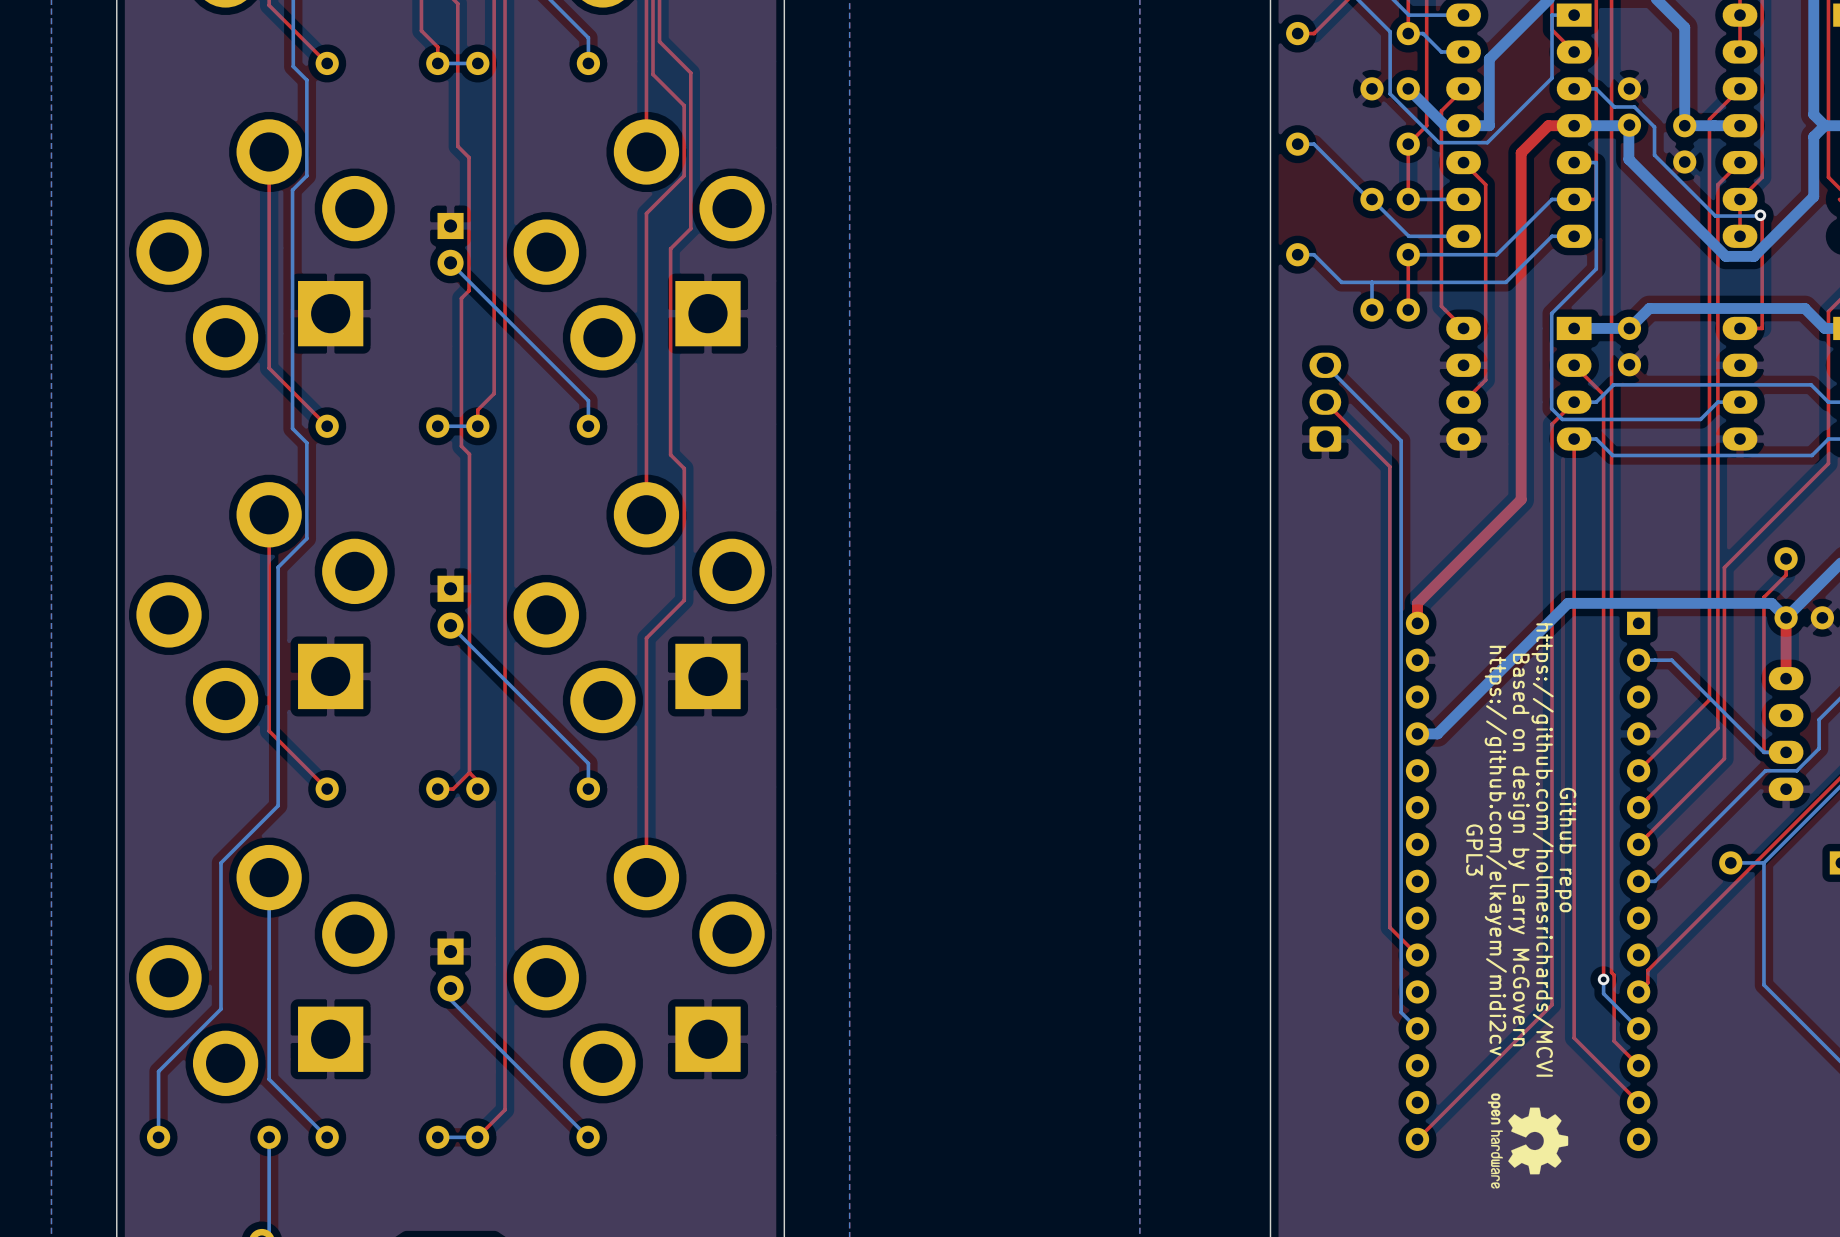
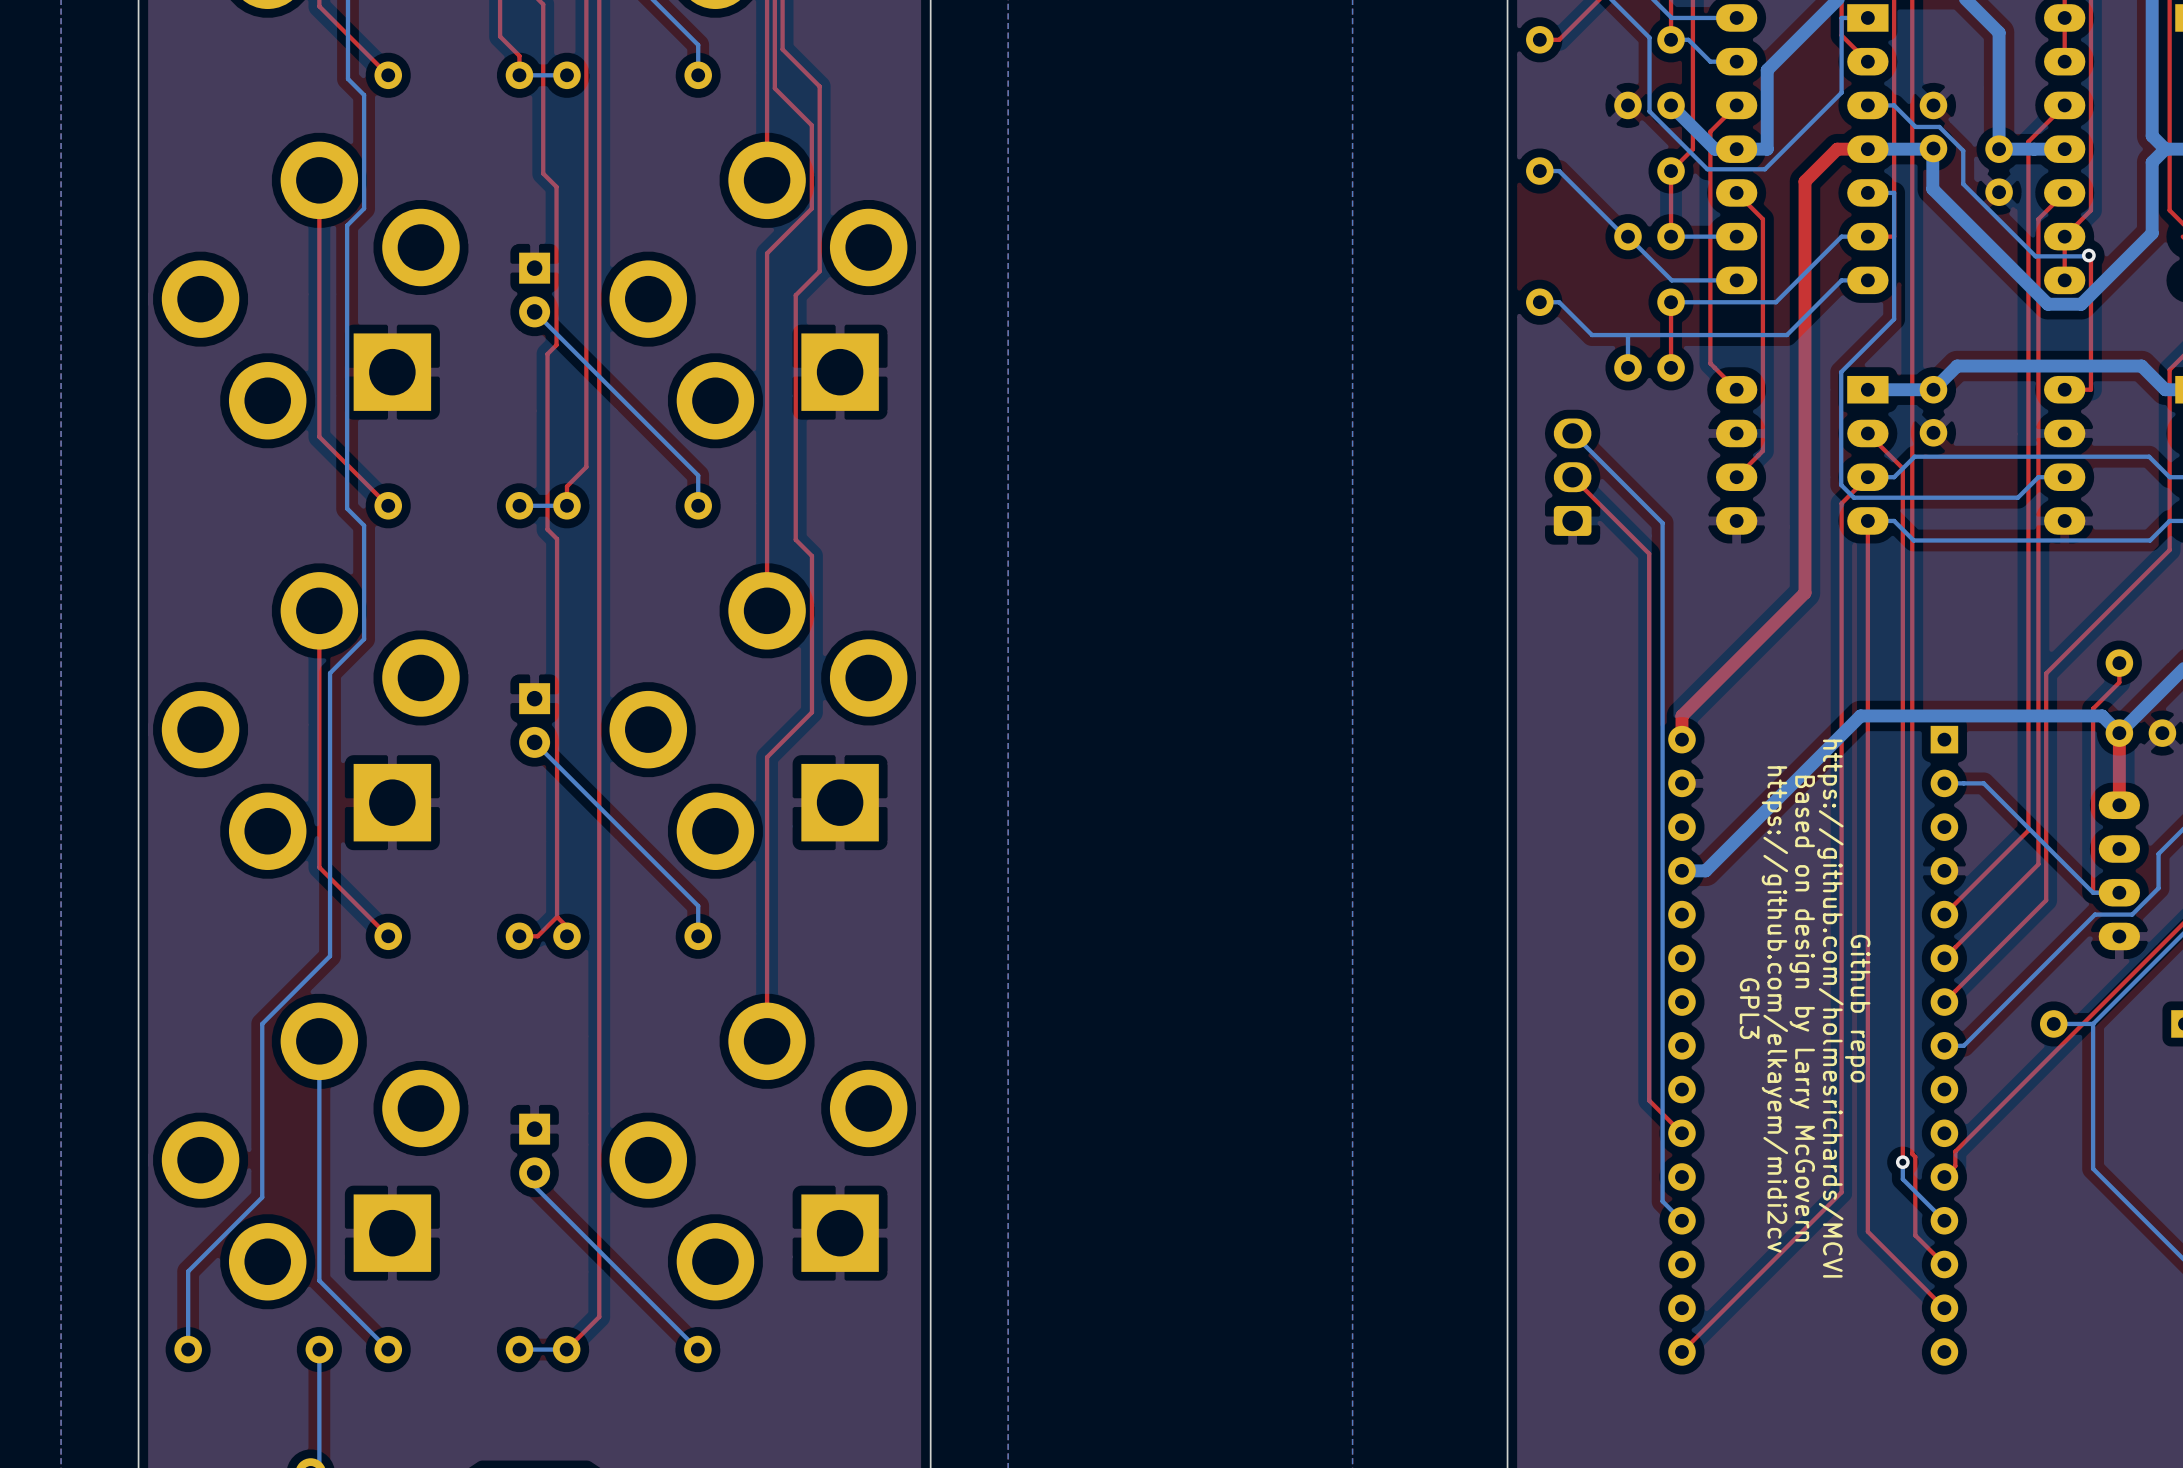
drawing: [1487, 1093, 1569, 1189] -> none

